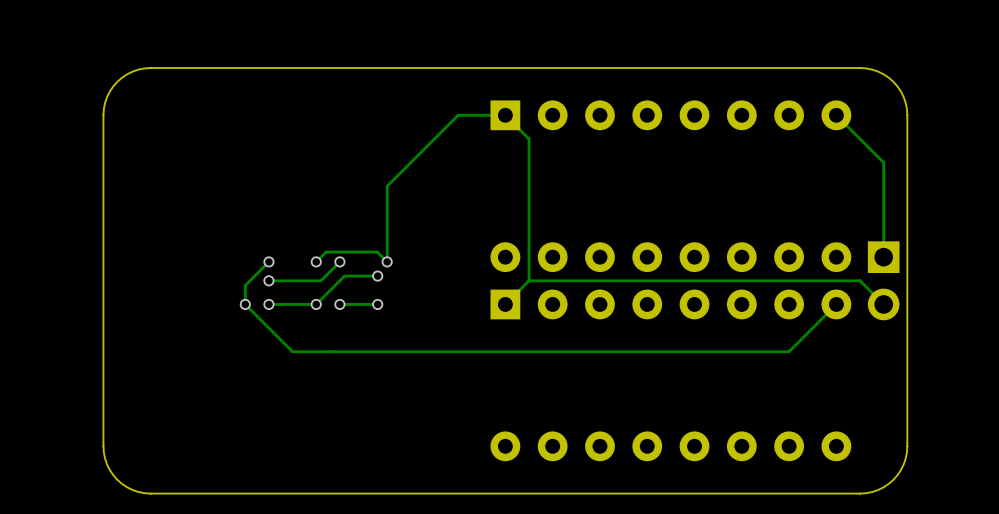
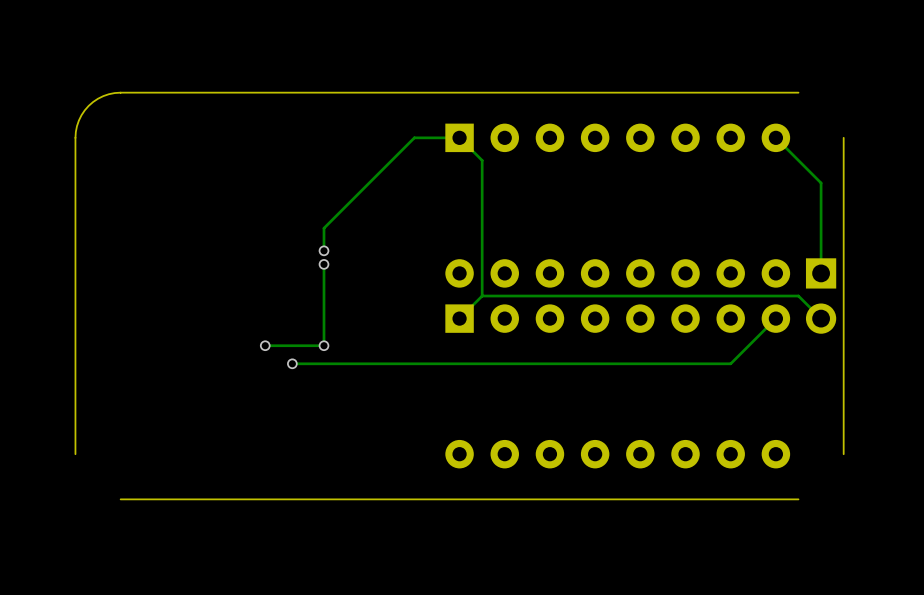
board edge: (860, 68) (878, 71) (893, 81) (903, 97) (907, 115) -> none
track: (387, 186) (387, 261) (377, 252) (326, 252) (316, 261) -> (346, 205) (324, 228) (324, 250)
via: none -> (324, 250)
track: none -> (324, 264) (324, 345) (265, 345)
via: none -> (324, 264)
track: (268, 261) (245, 285) (245, 304) (292, 351) (330, 351) -> none
via: (268, 261) -> none
via: (316, 261) -> none
track: (339, 261) (320, 280) (268, 280) -> none
via: (339, 261) -> none
via: (387, 261) -> none
track: (377, 276) (344, 276) (316, 304) (268, 304) -> none
via: (377, 276) -> none
via: (268, 280) -> none
via: (245, 304) -> none
via: (268, 304) -> none
via: (316, 304) -> none
via: (339, 304) -> none
track: (377, 304) (339, 304) -> none
via: (377, 304) -> none
via: none -> (265, 345)
via: none -> (324, 345)
via: none -> (292, 363)
board edge: (103, 446) (107, 464) (117, 479) (132, 490) (150, 493) -> none
board edge: (907, 446) (903, 464) (893, 479) (878, 490) (860, 493) -> none

